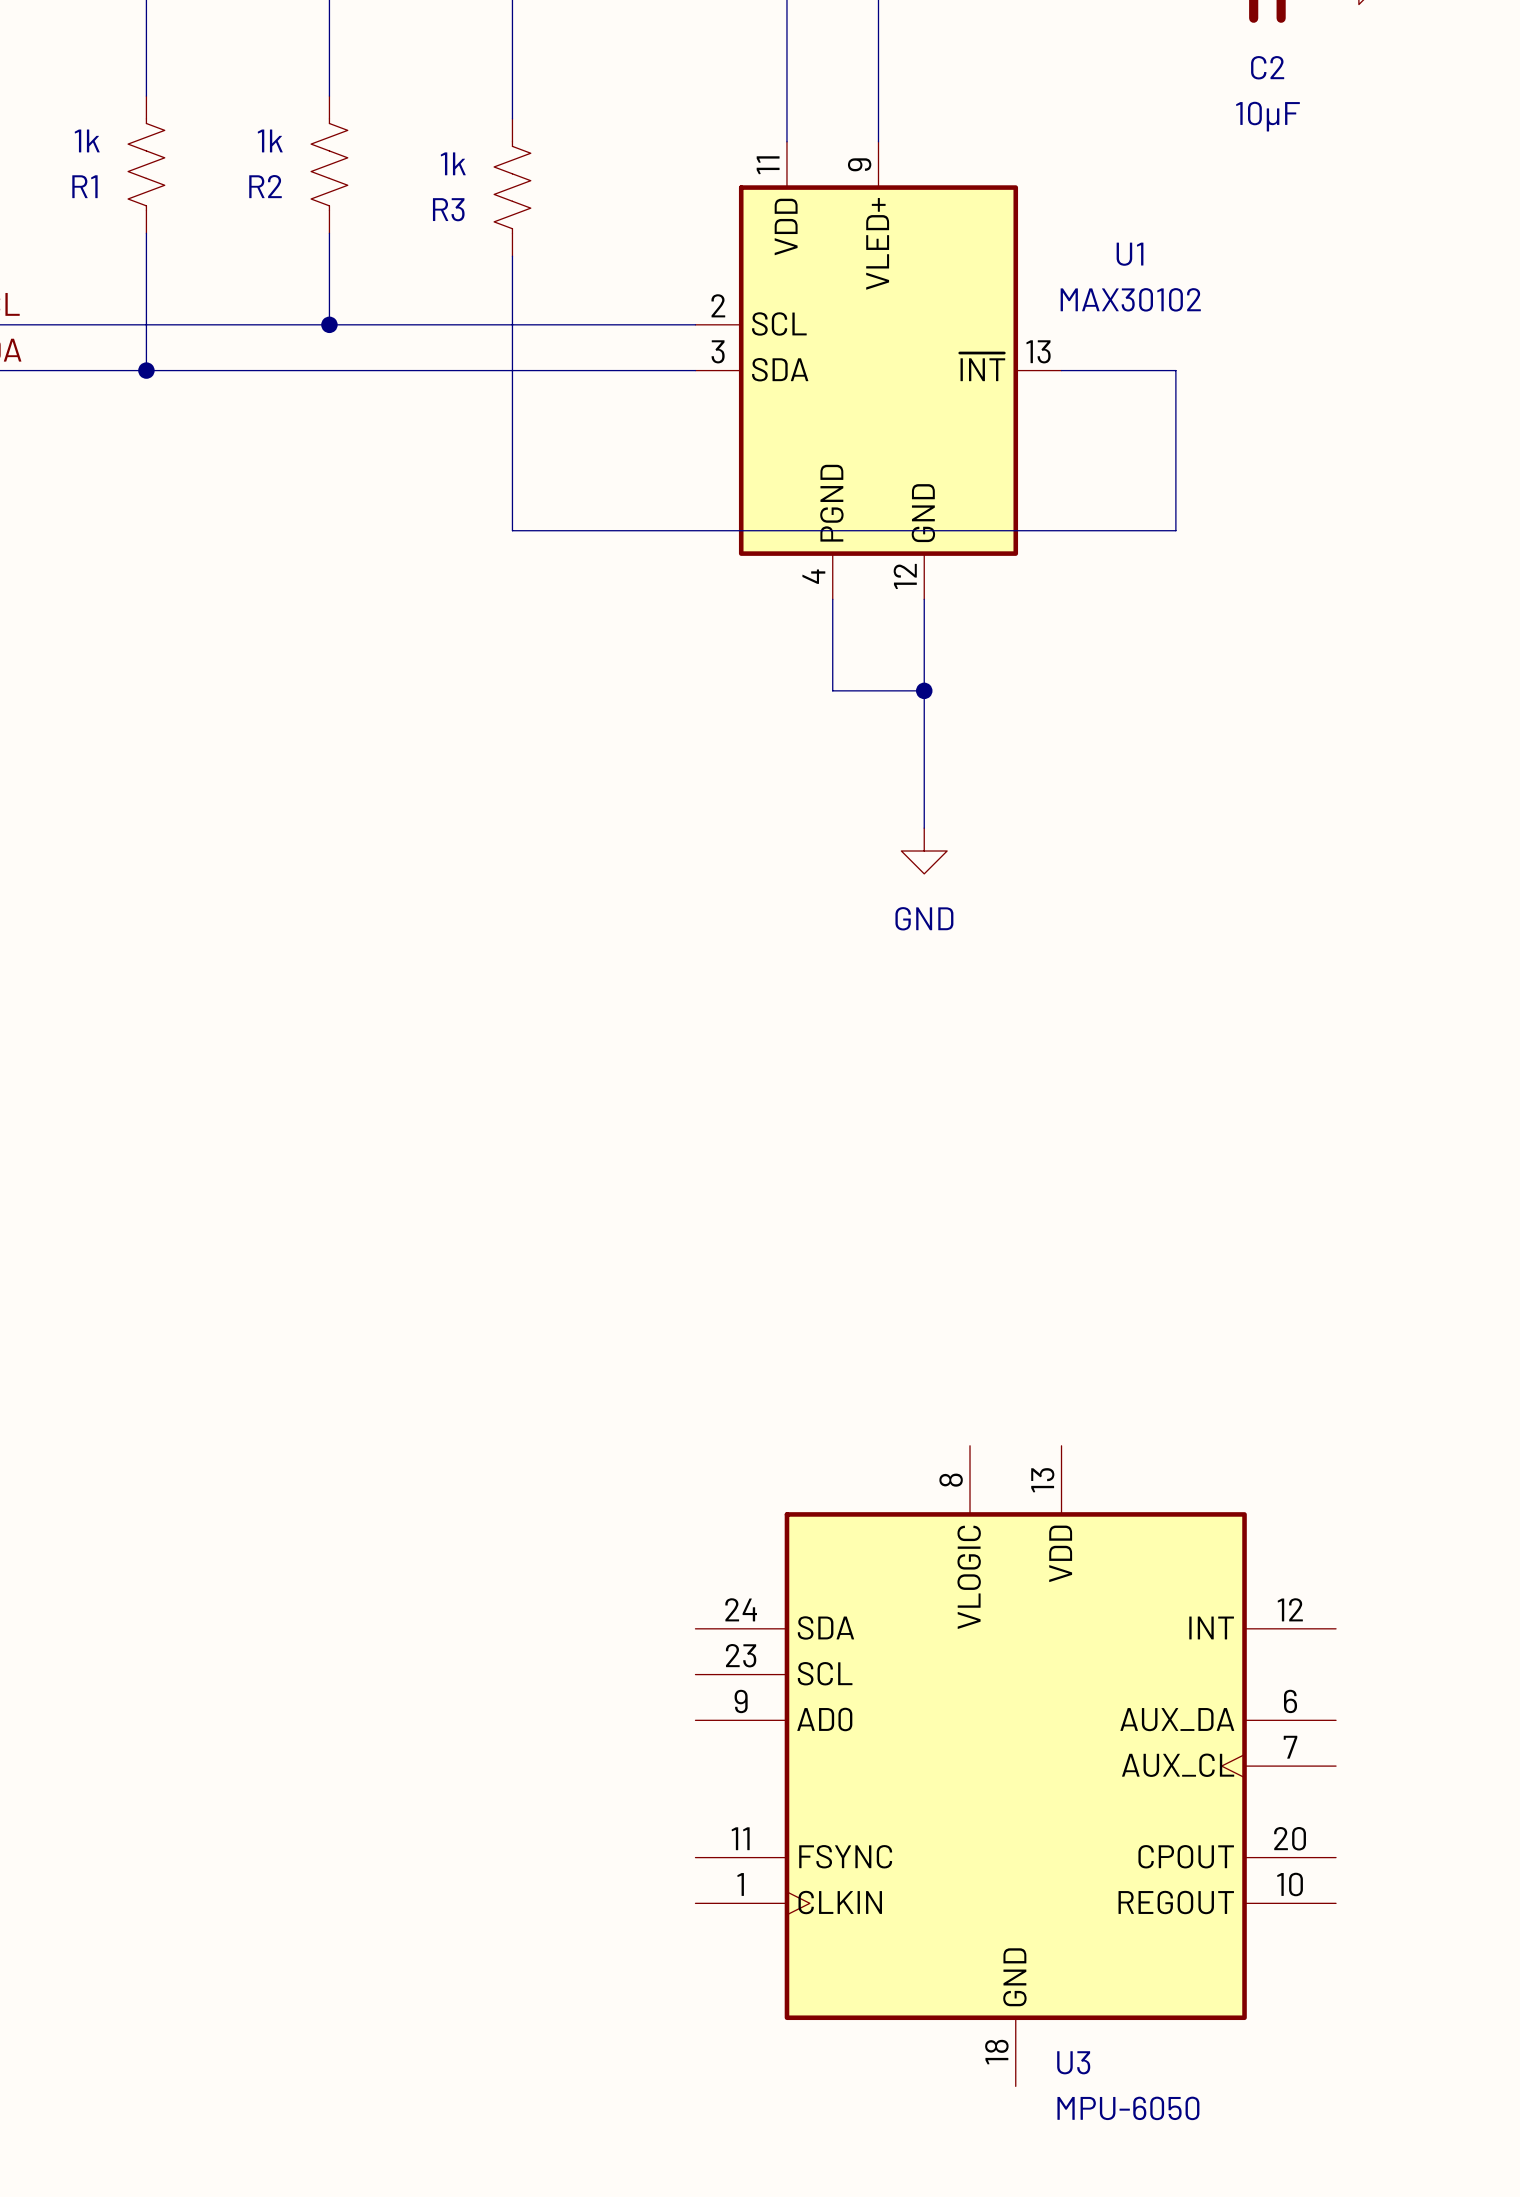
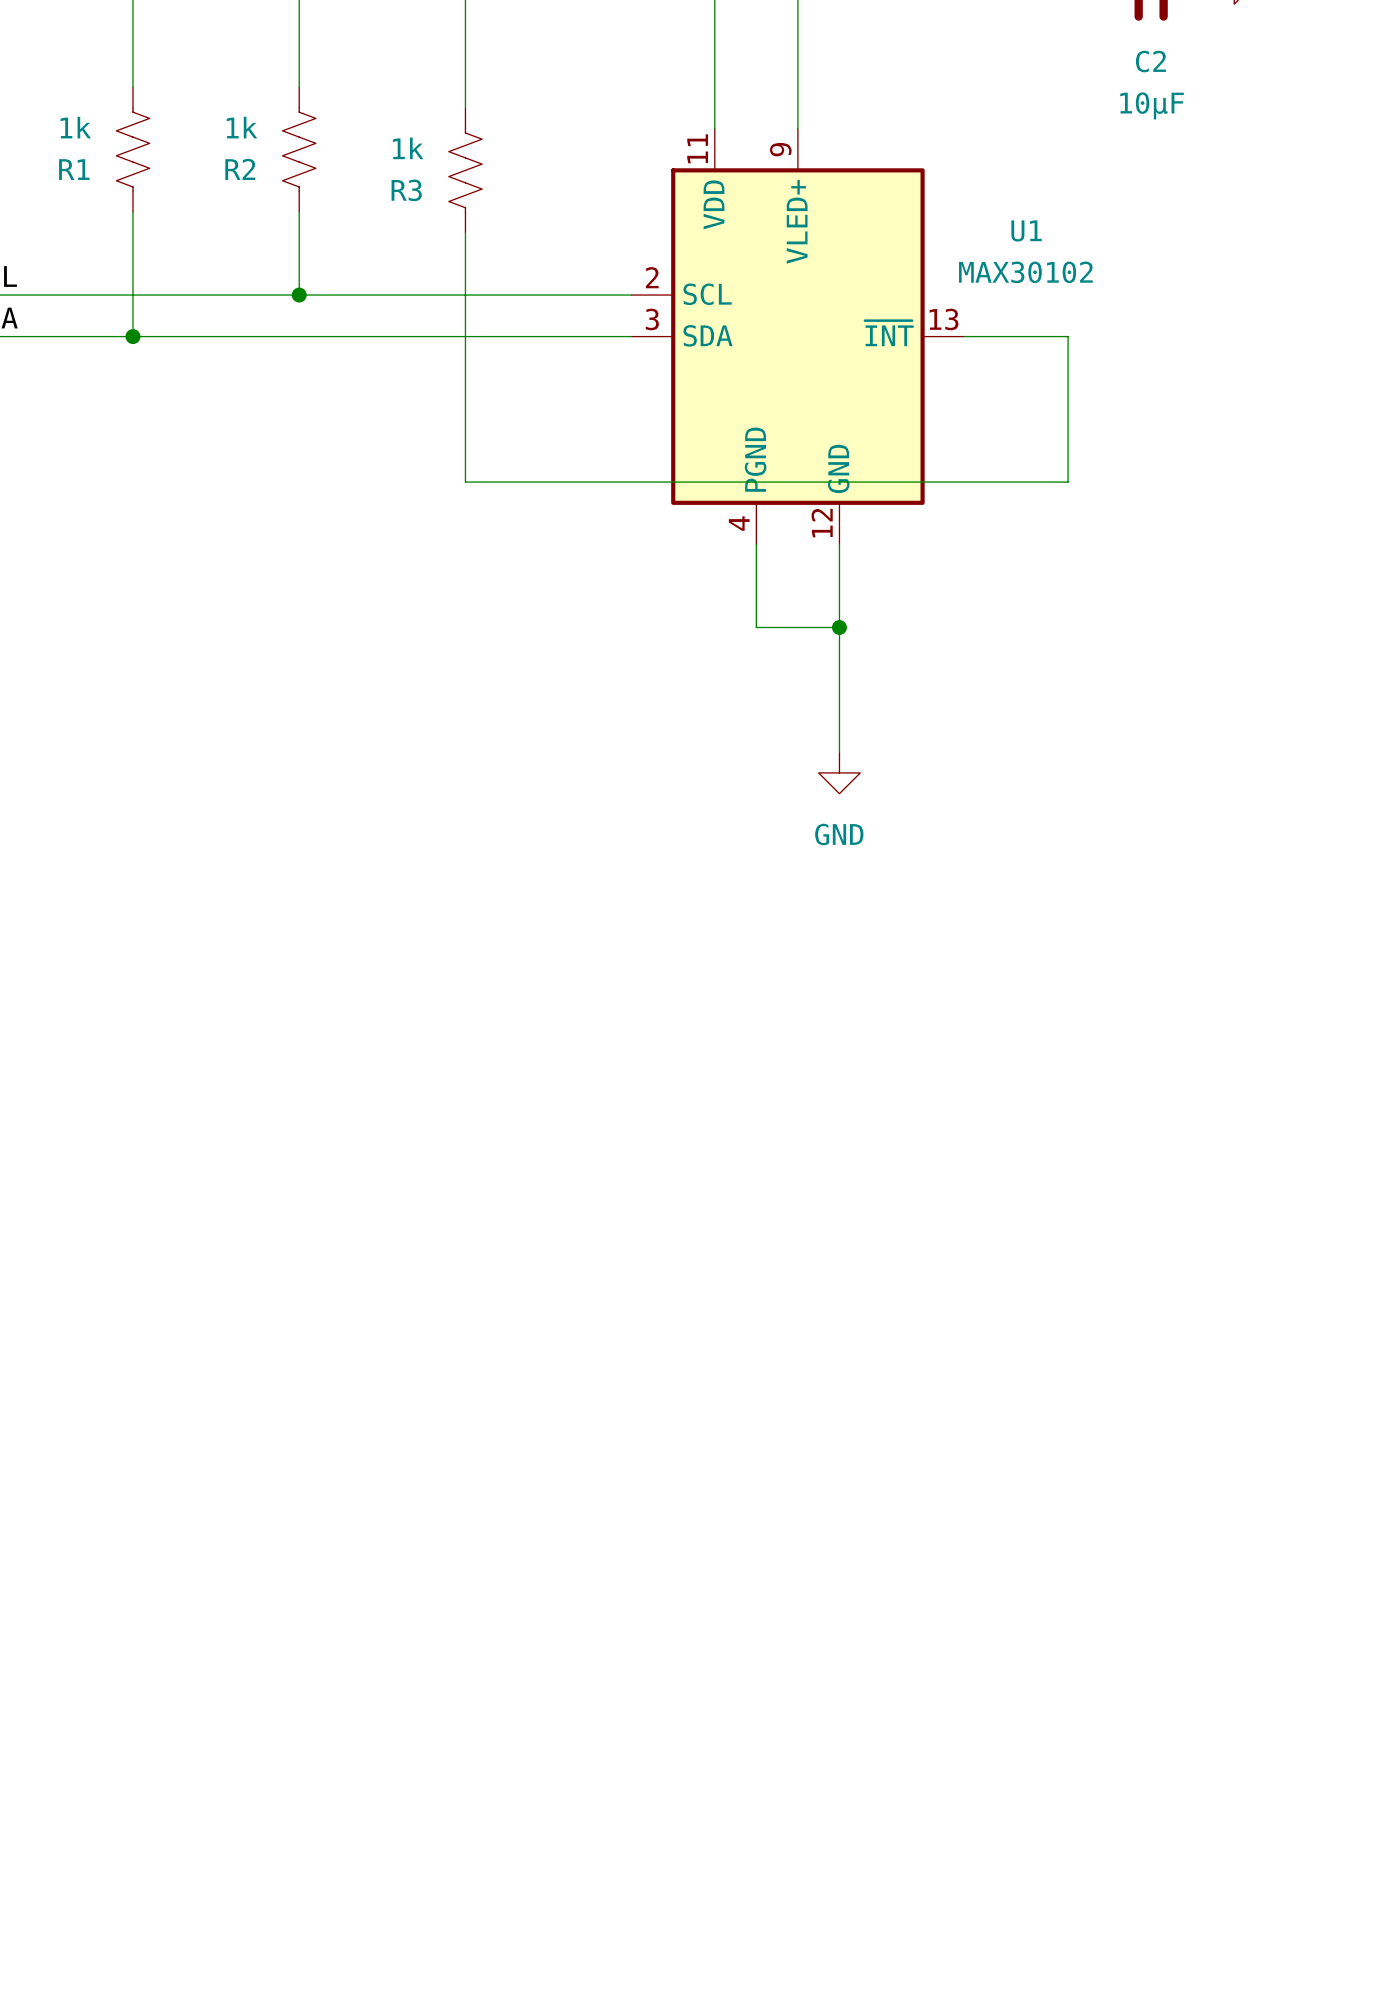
U3: MPU-6050 (1015, 1766) -> none

